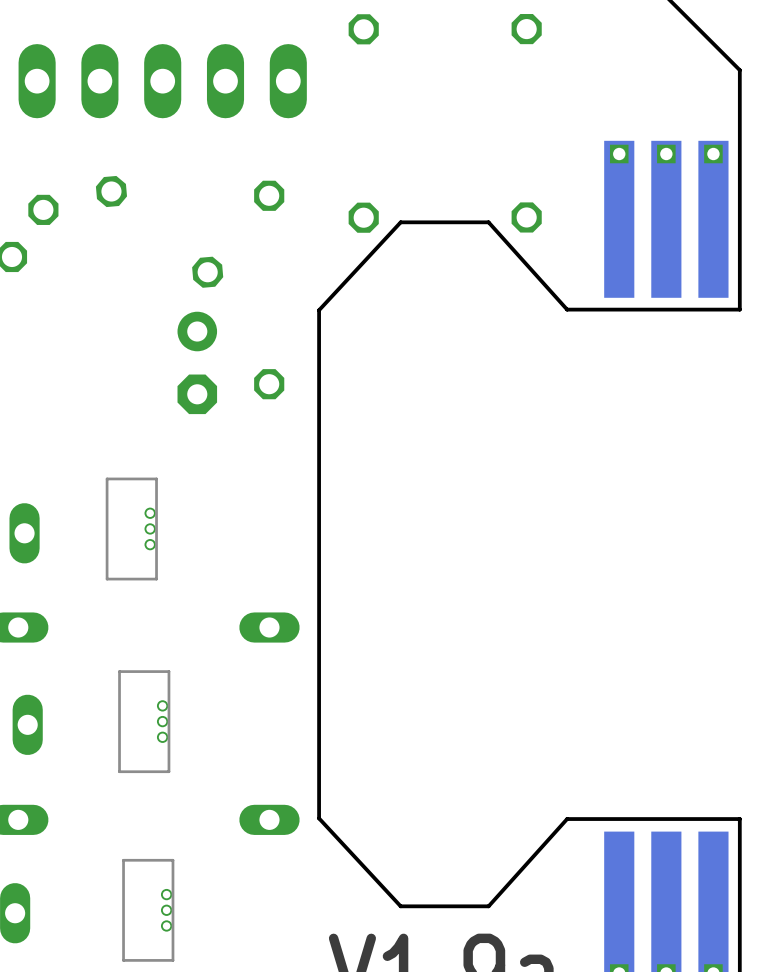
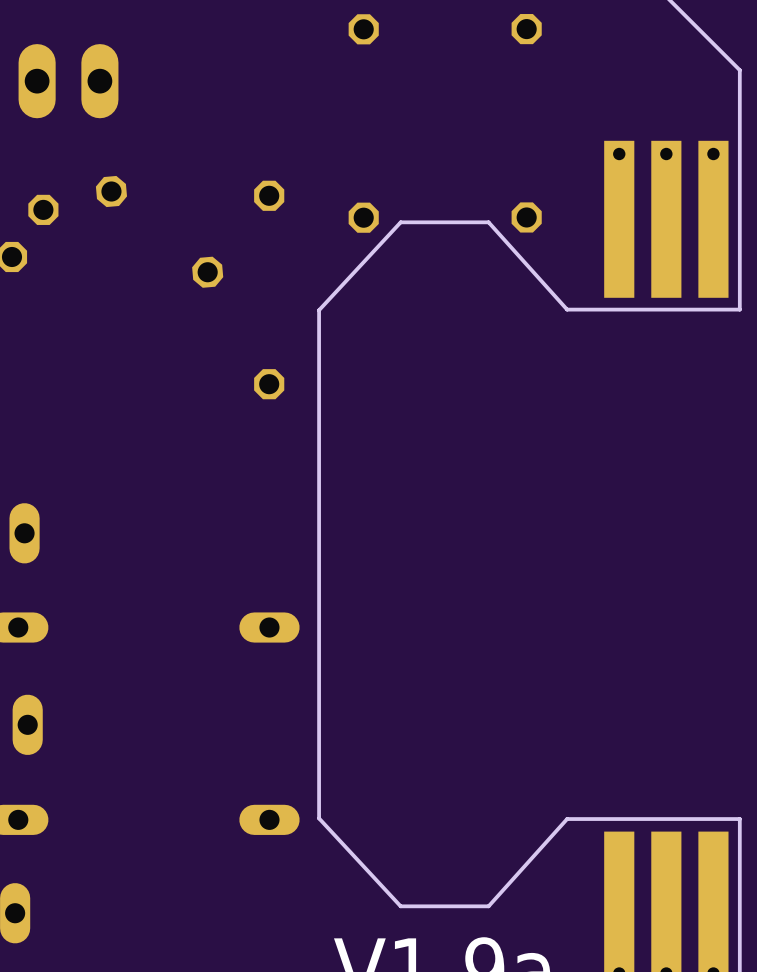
part: (225, 81) -> none
part: (197, 362) -> none
part: (131, 529) -> none
part: (144, 721) -> none
part: (148, 910) -> none

